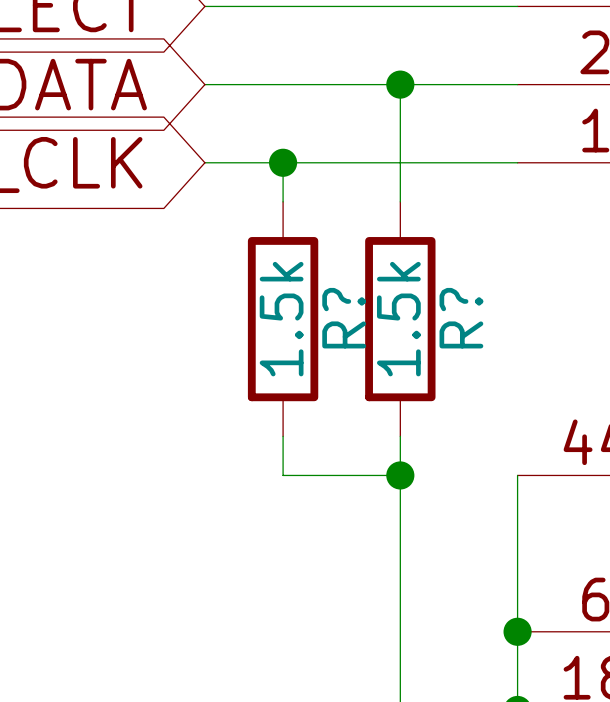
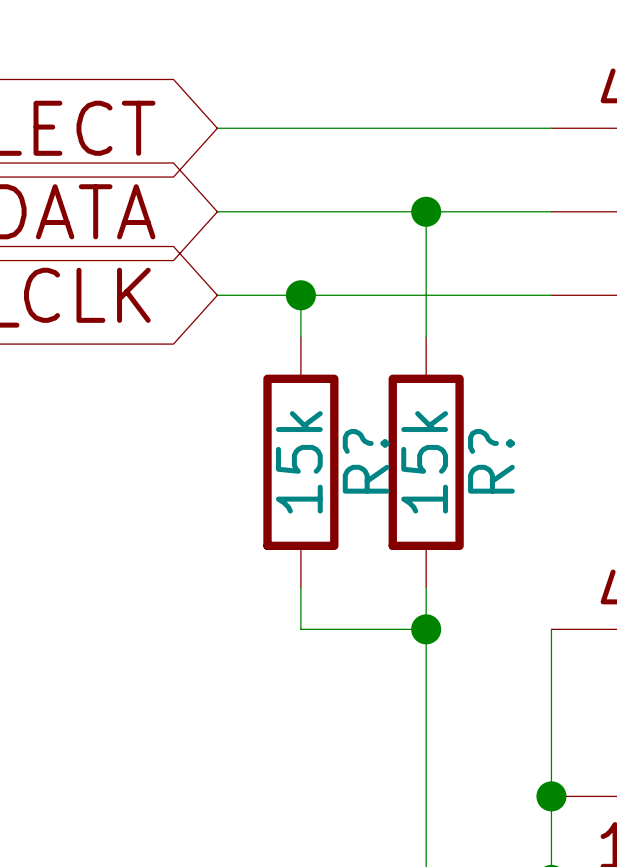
R? value: 1.5k (281, 319) -> 15k (299, 462)
R? value: 1.5k (398, 319) -> 15k (424, 462)

